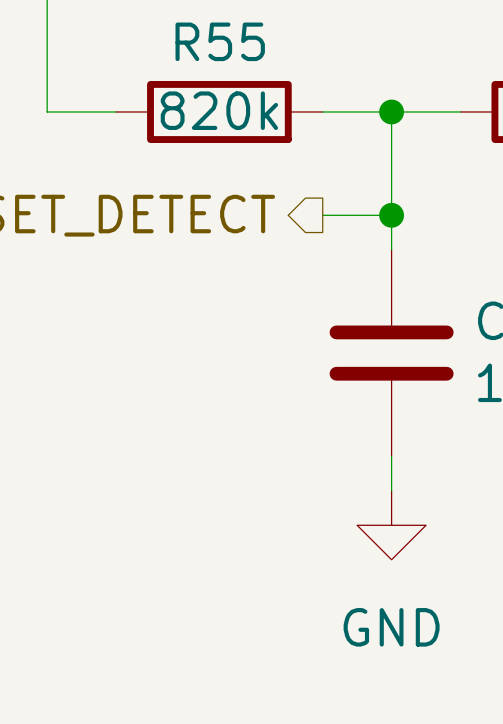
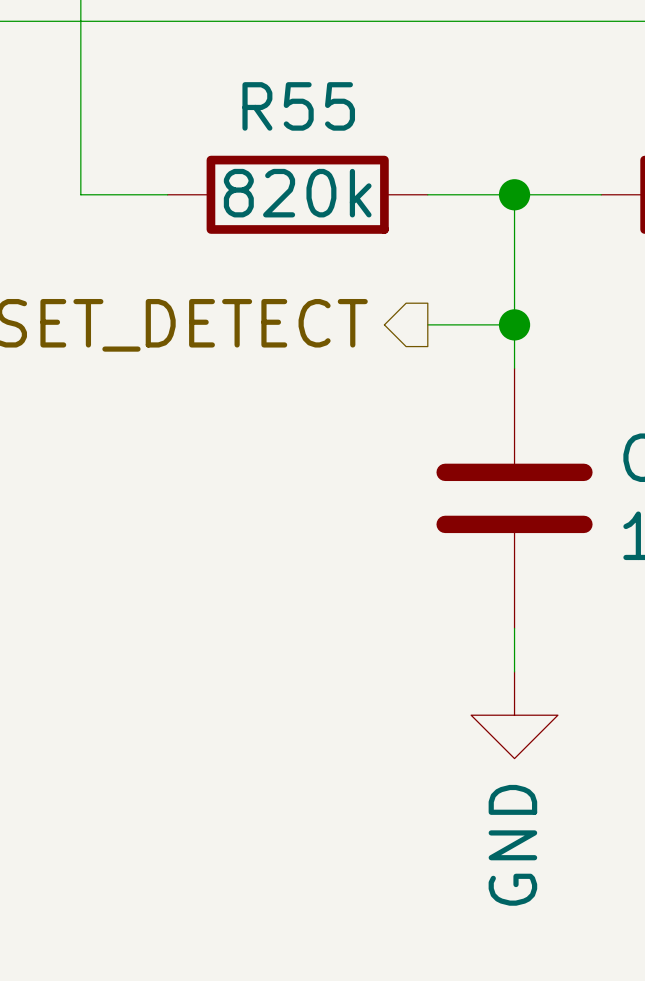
power symbol text rotation: 0° (391, 627) -> 90° counterclockwise (512, 845)

